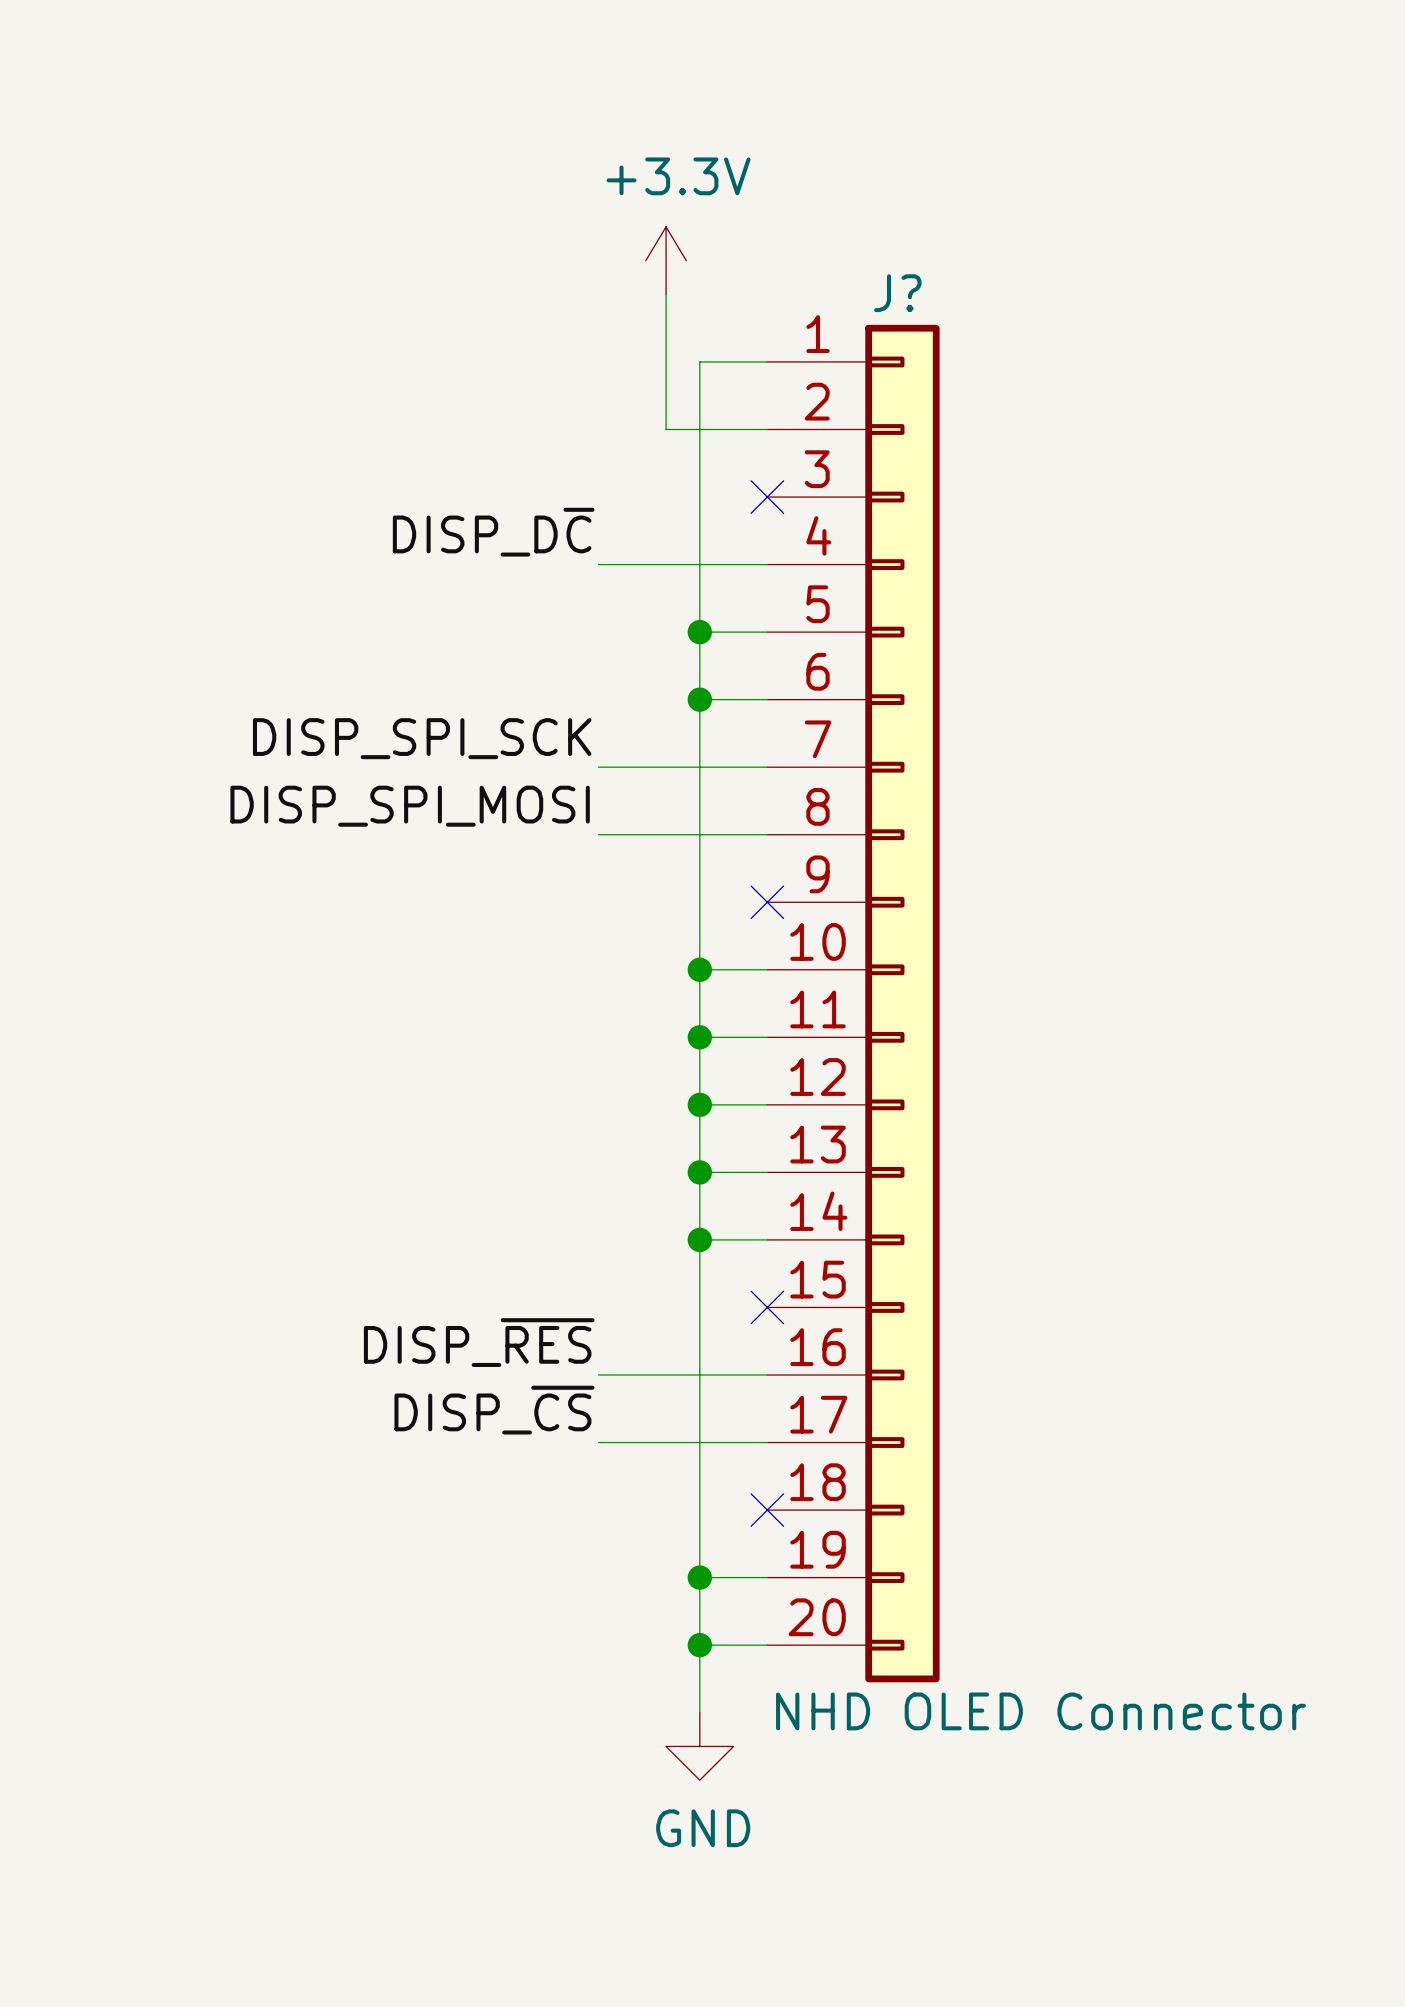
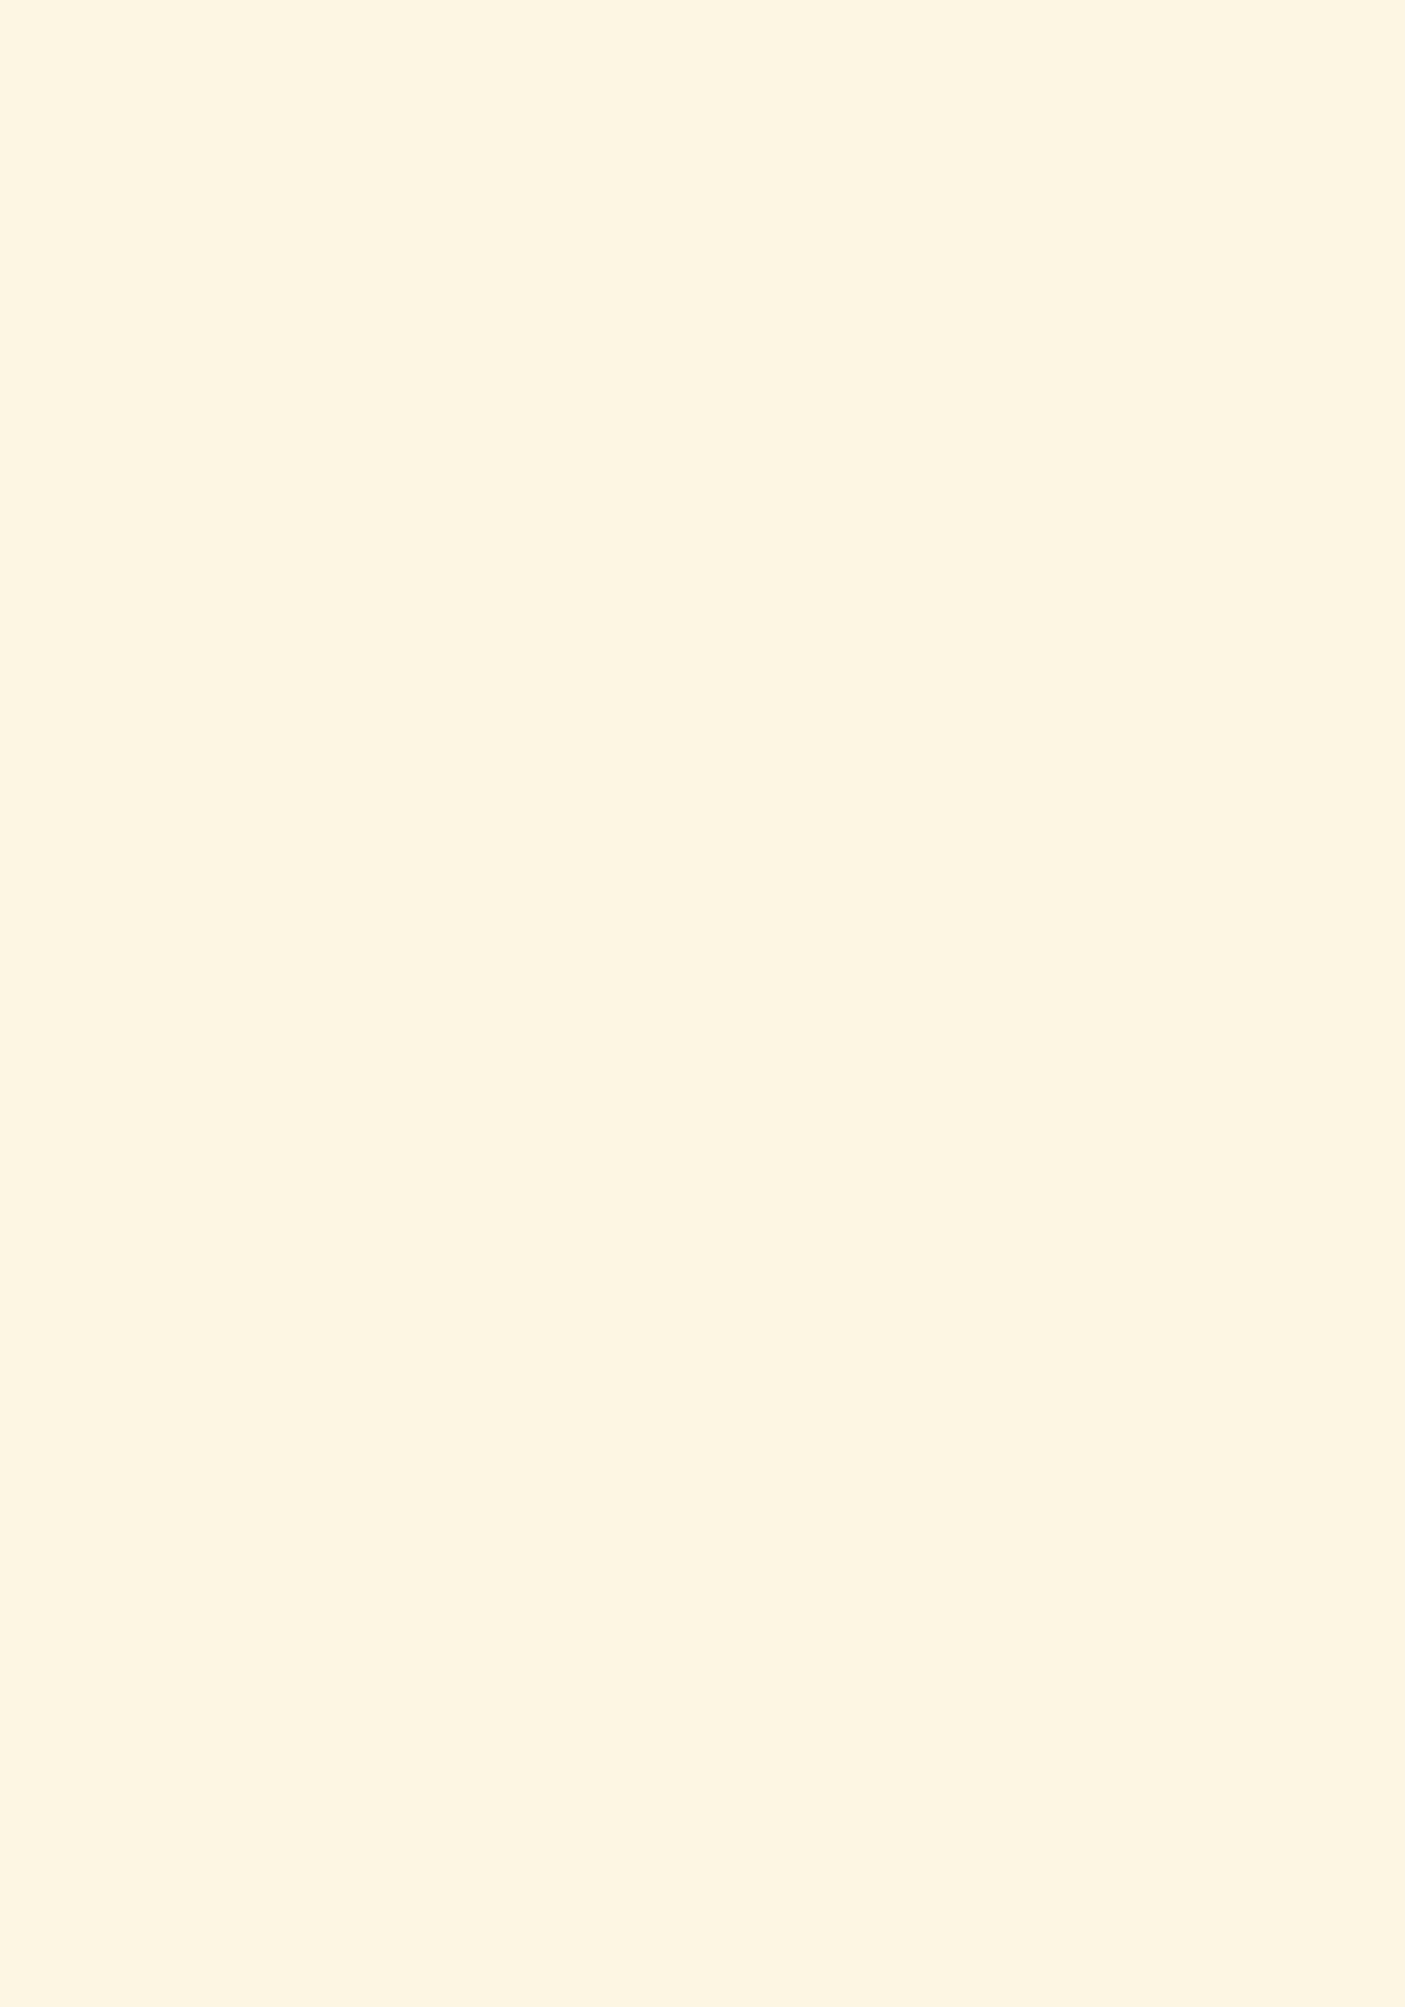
power symbol: +3.3V (666, 260) -> none
wire: (666, 294) (666, 429) (767, 429) -> none
wire: (767, 361) (699, 361) (699, 1712) -> none
no-connect mark: (767, 497) -> none
label: DISP_D~{C} (493, 532) -> none
wire: (598, 564) (767, 564) -> none
wire: (699, 632) (767, 632) -> none
junction: (699, 632) -> none
wire: (699, 699) (767, 699) -> none
junction: (699, 699) -> none
label: DISP_SPI_SCK (422, 738) -> none
wire: (598, 767) (767, 767) -> none
label: DISP_SPI_MOSI (410, 806) -> none
wire: (598, 834) (767, 834) -> none
no-connect mark: (767, 902) -> none
wire: (699, 969) (767, 969) -> none
junction: (699, 969) -> none
J?: NHD OLED Connector (853, 1003) -> none
wire: (699, 1037) (767, 1037) -> none
junction: (699, 1037) -> none
wire: (699, 1104) (767, 1104) -> none
junction: (699, 1104) -> none
wire: (699, 1172) (767, 1172) -> none
junction: (699, 1172) -> none
wire: (699, 1239) (767, 1239) -> none
junction: (699, 1239) -> none
no-connect mark: (767, 1307) -> none
label: DISP_~{RES} (479, 1342) -> none
wire: (598, 1375) (767, 1375) -> none
label: DISP_~{CS} (494, 1410) -> none
wire: (598, 1442) (767, 1442) -> none
no-connect mark: (767, 1510) -> none
wire: (699, 1577) (767, 1577) -> none
junction: (699, 1577) -> none
wire: (699, 1645) (767, 1645) -> none
junction: (699, 1645) -> none
power symbol: GND (699, 1746) -> none

